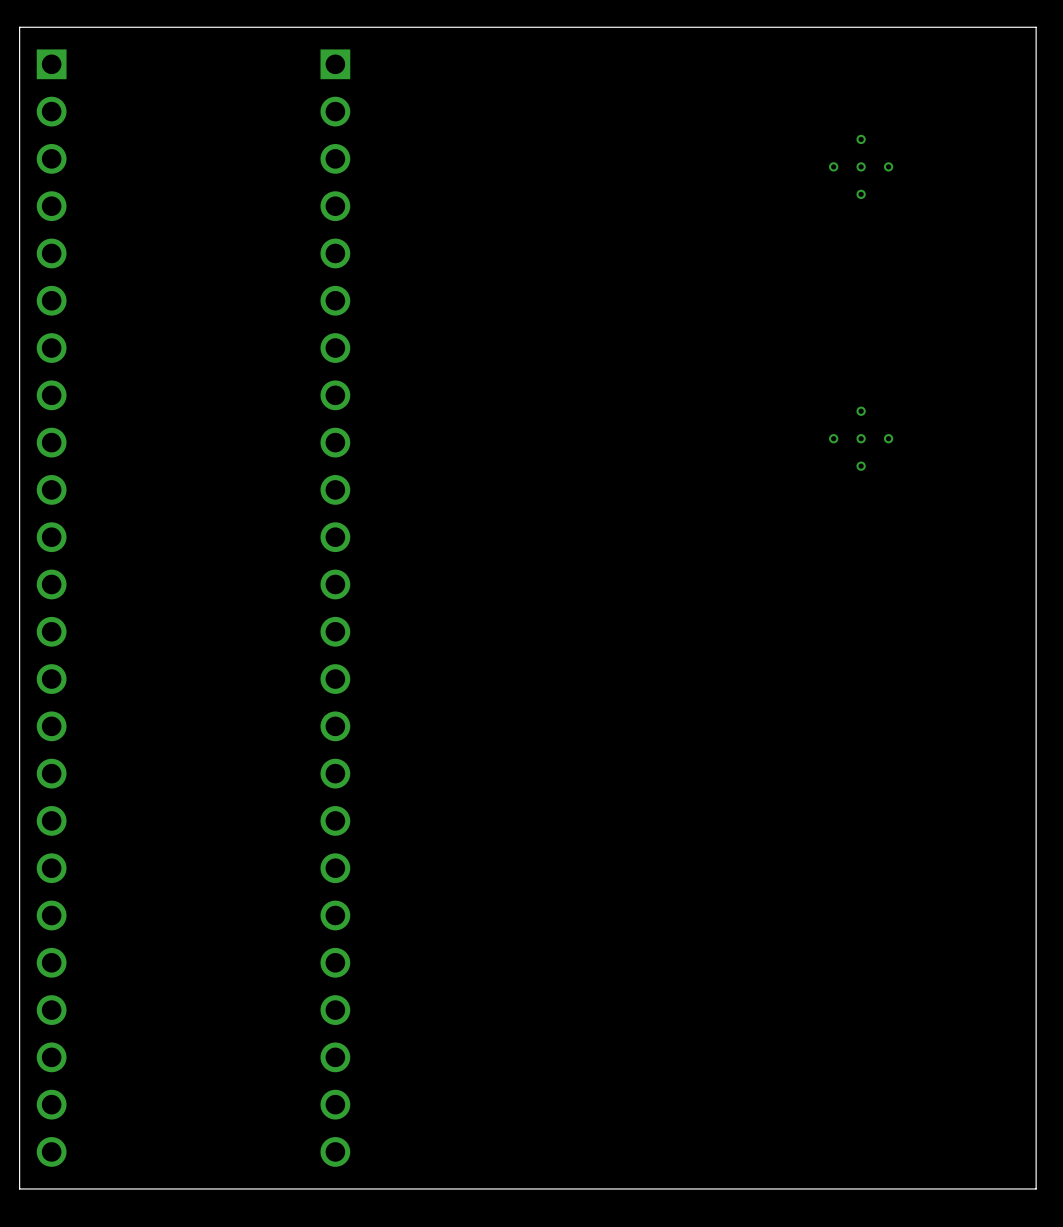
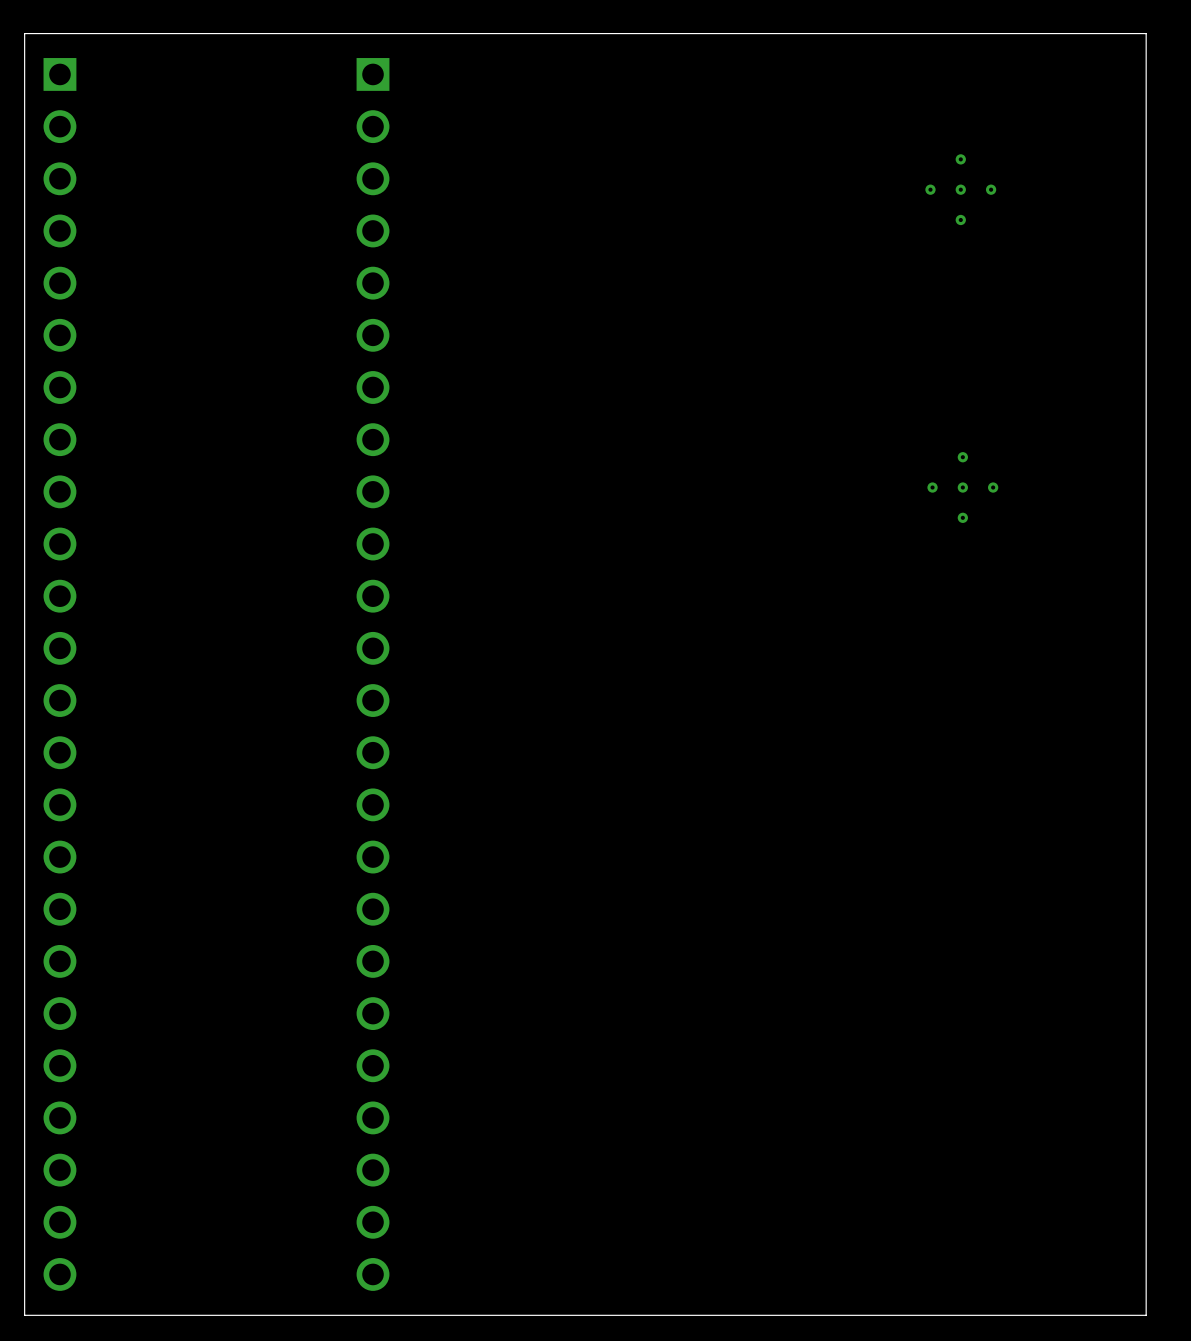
part footprint: [829, 134, 894, 200] -> [925, 154, 997, 226]
part footprint: [829, 406, 894, 471] -> [927, 452, 999, 523]

